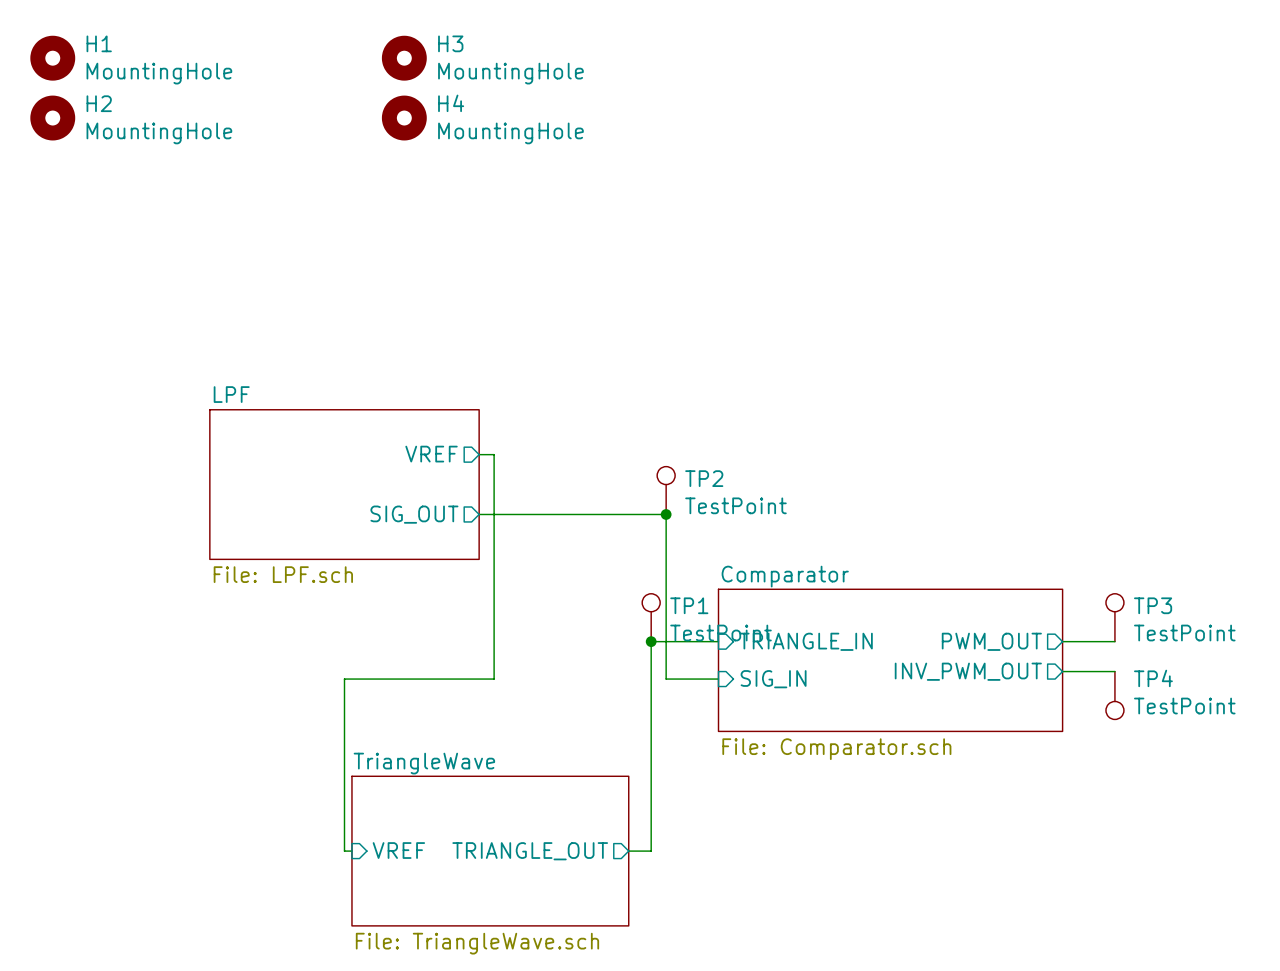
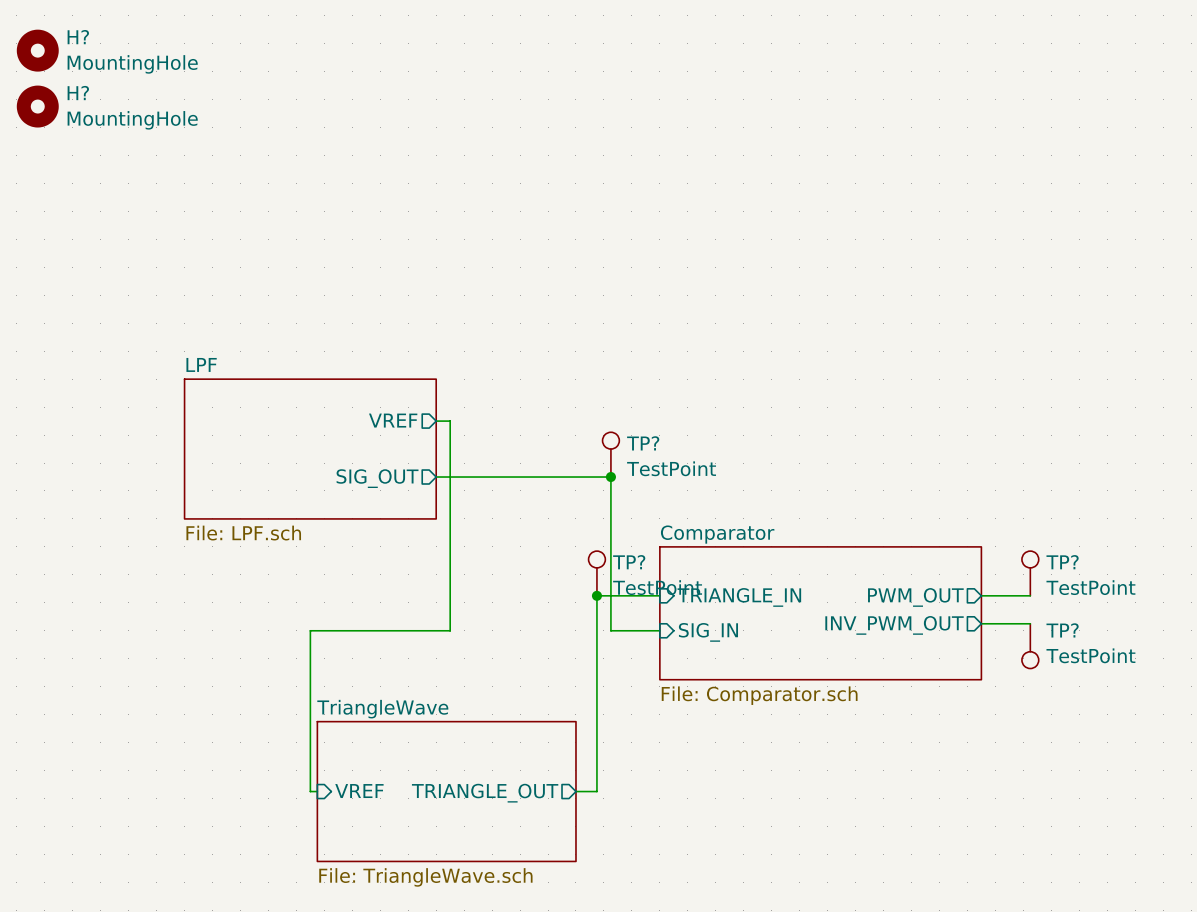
H1 name: H1 (99, 43) -> H? (78, 37)
H3: MountingHole (404, 58) -> none
H2 name: H2 (99, 103) -> H? (78, 93)
H4: MountingHole (404, 118) -> none
TP2 name: TP2 (704, 478) -> TP? (643, 443)
TP1 name: TP1 (689, 605) -> TP? (629, 562)
TP3 name: TP3 (1153, 605) -> TP? (1062, 562)
TP4 name: TP4 (1153, 678) -> TP? (1062, 630)

